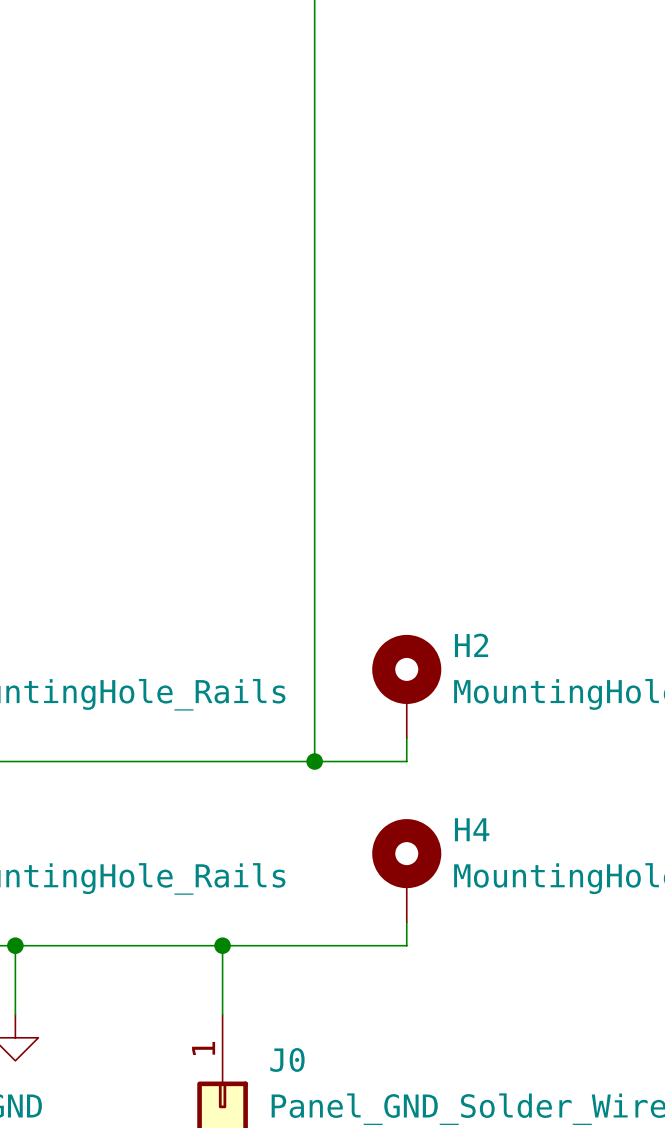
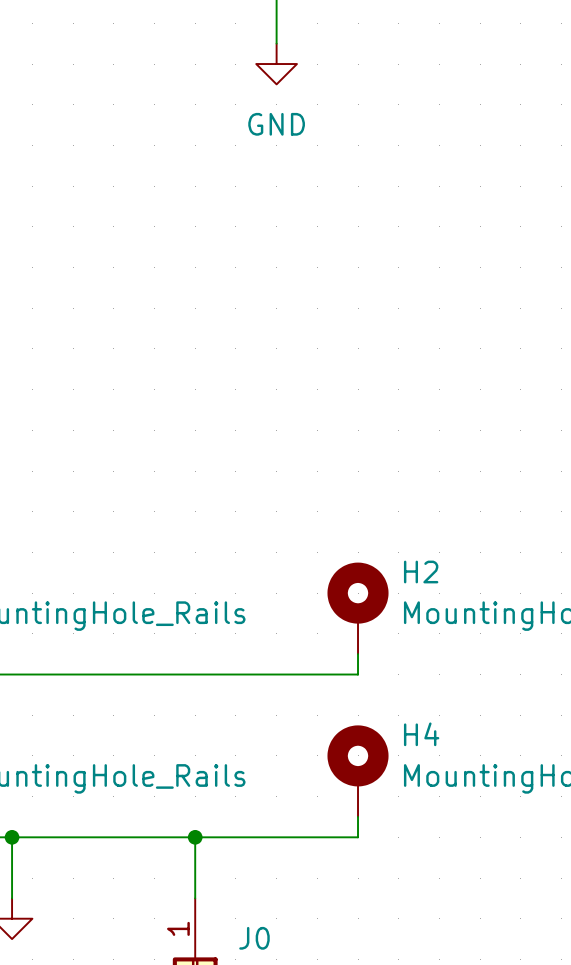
wire: (314, 47) (314, 761) -> none
power symbol: none -> GND (276, 64)
junction: (314, 761) -> none

